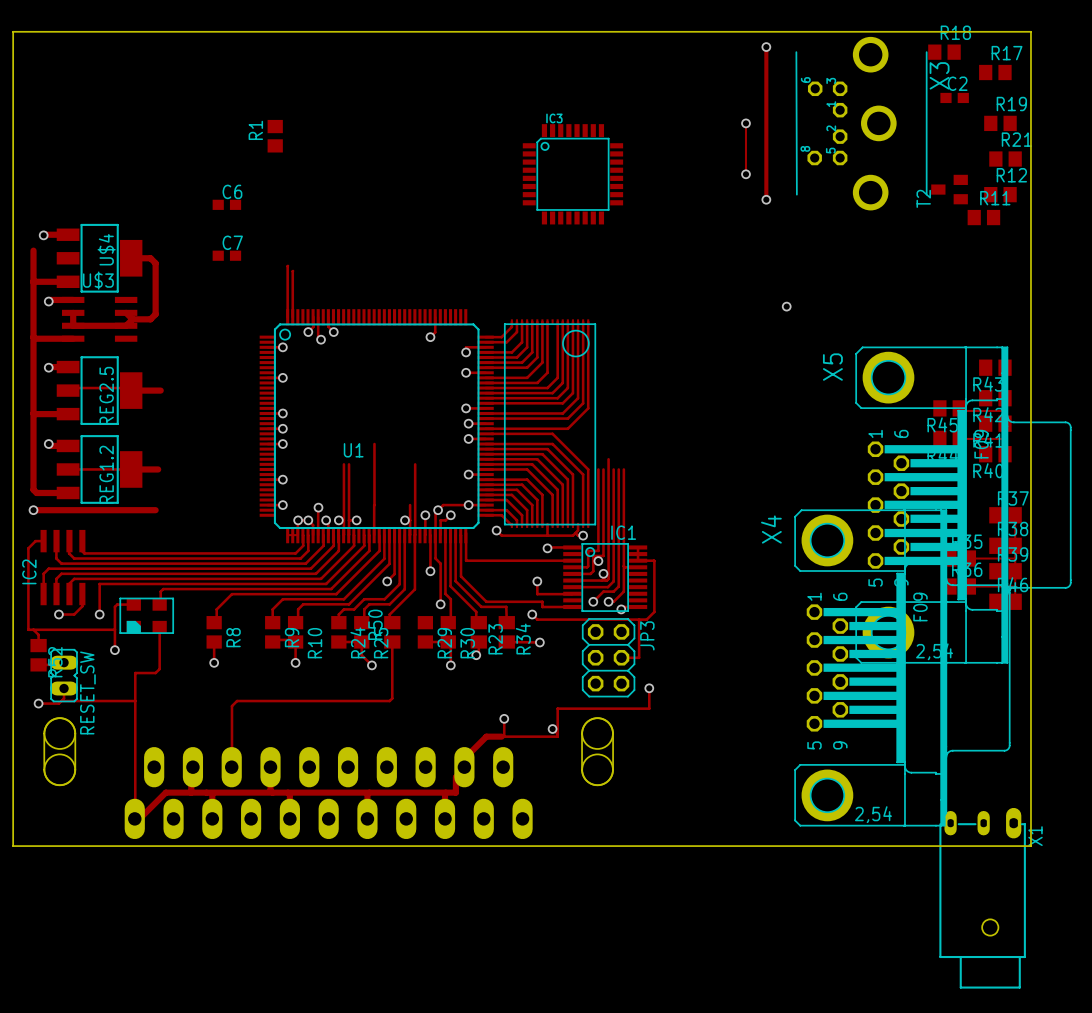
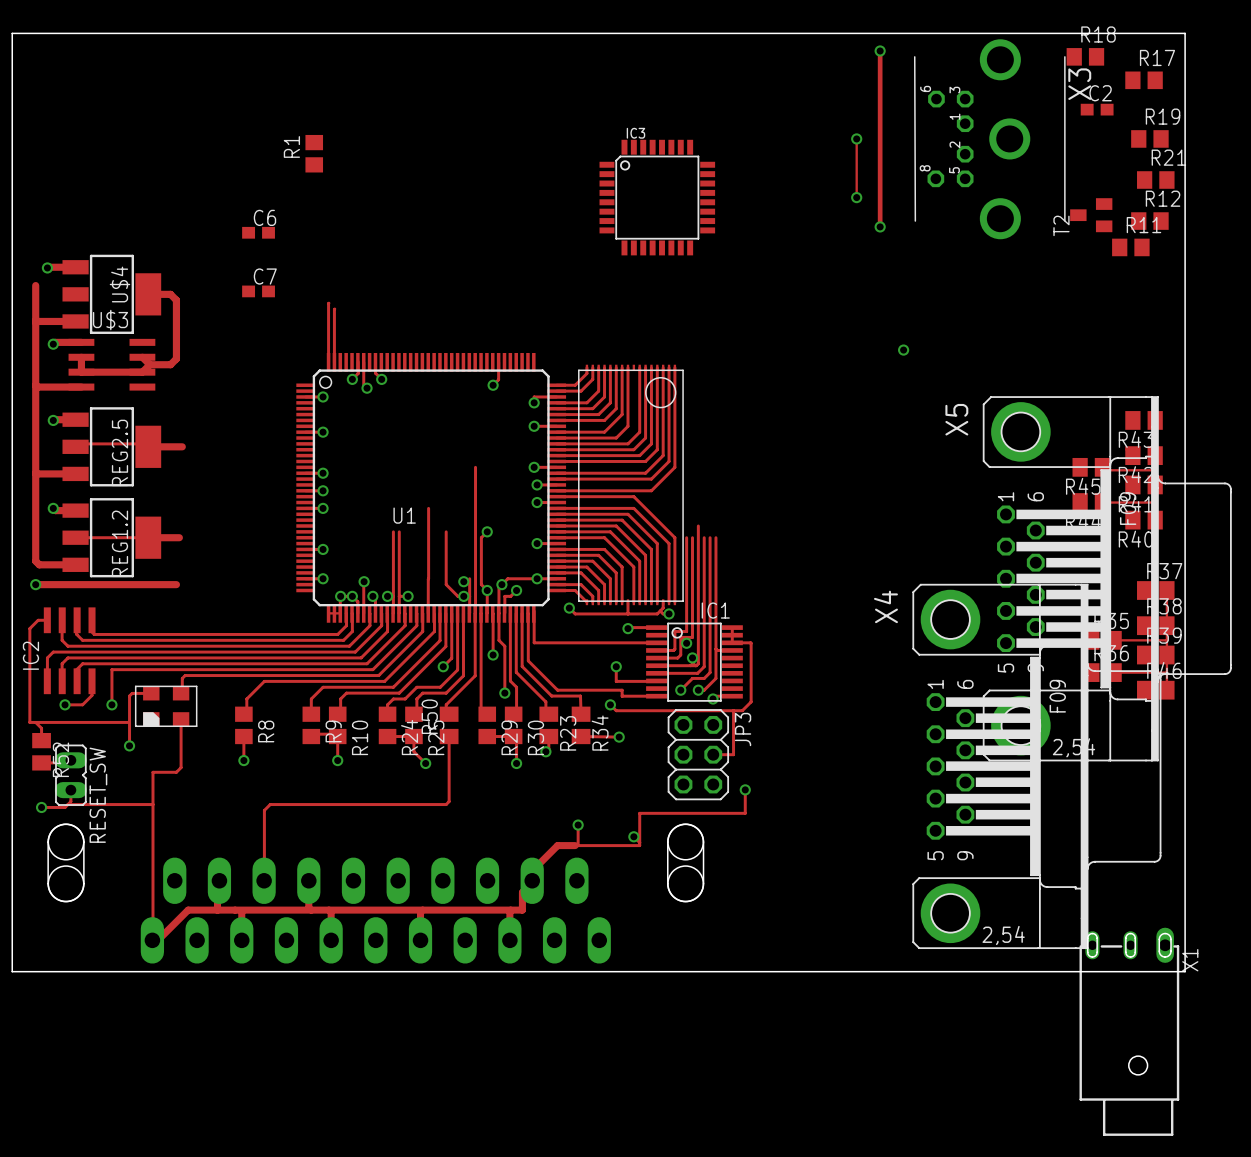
track: none -> (475, 467) (475, 531)
track: none -> (446, 531) (446, 584) (457, 596) (463, 596)
track: none -> (487, 531) (481, 537) (481, 584) (487, 590)
via: none -> (487, 531)
via: none -> (463, 581)
track: none -> (481, 613) (481, 710)

